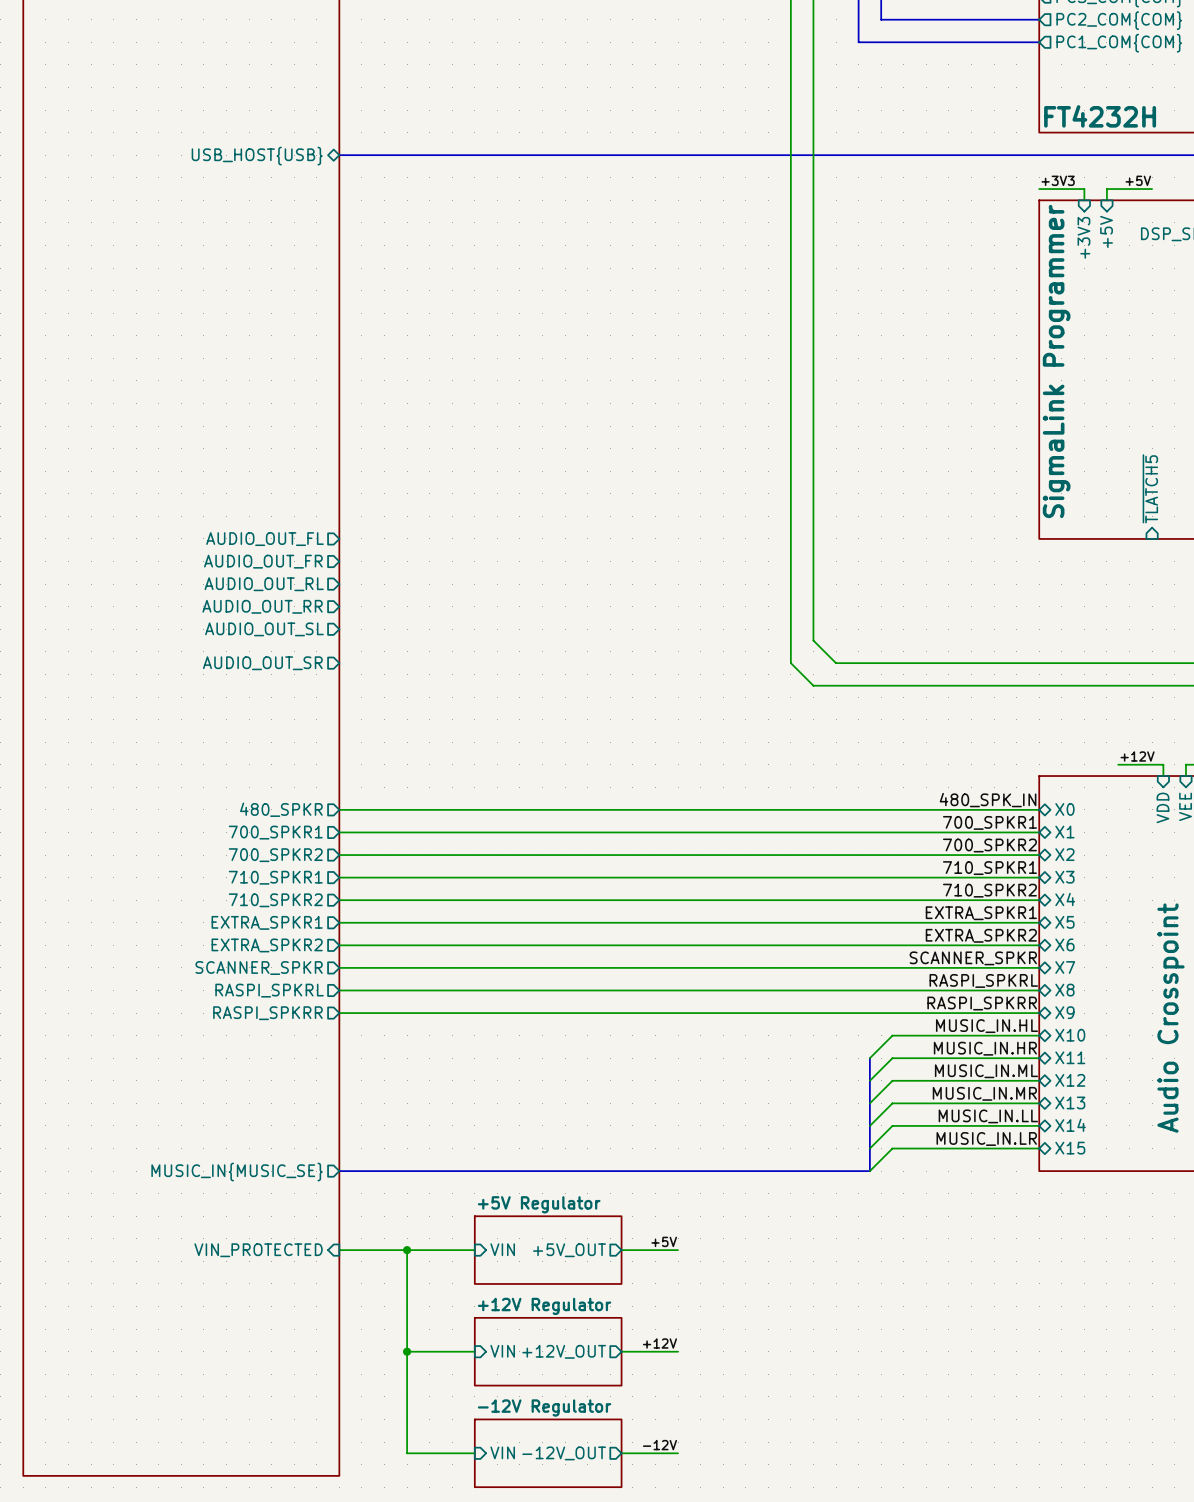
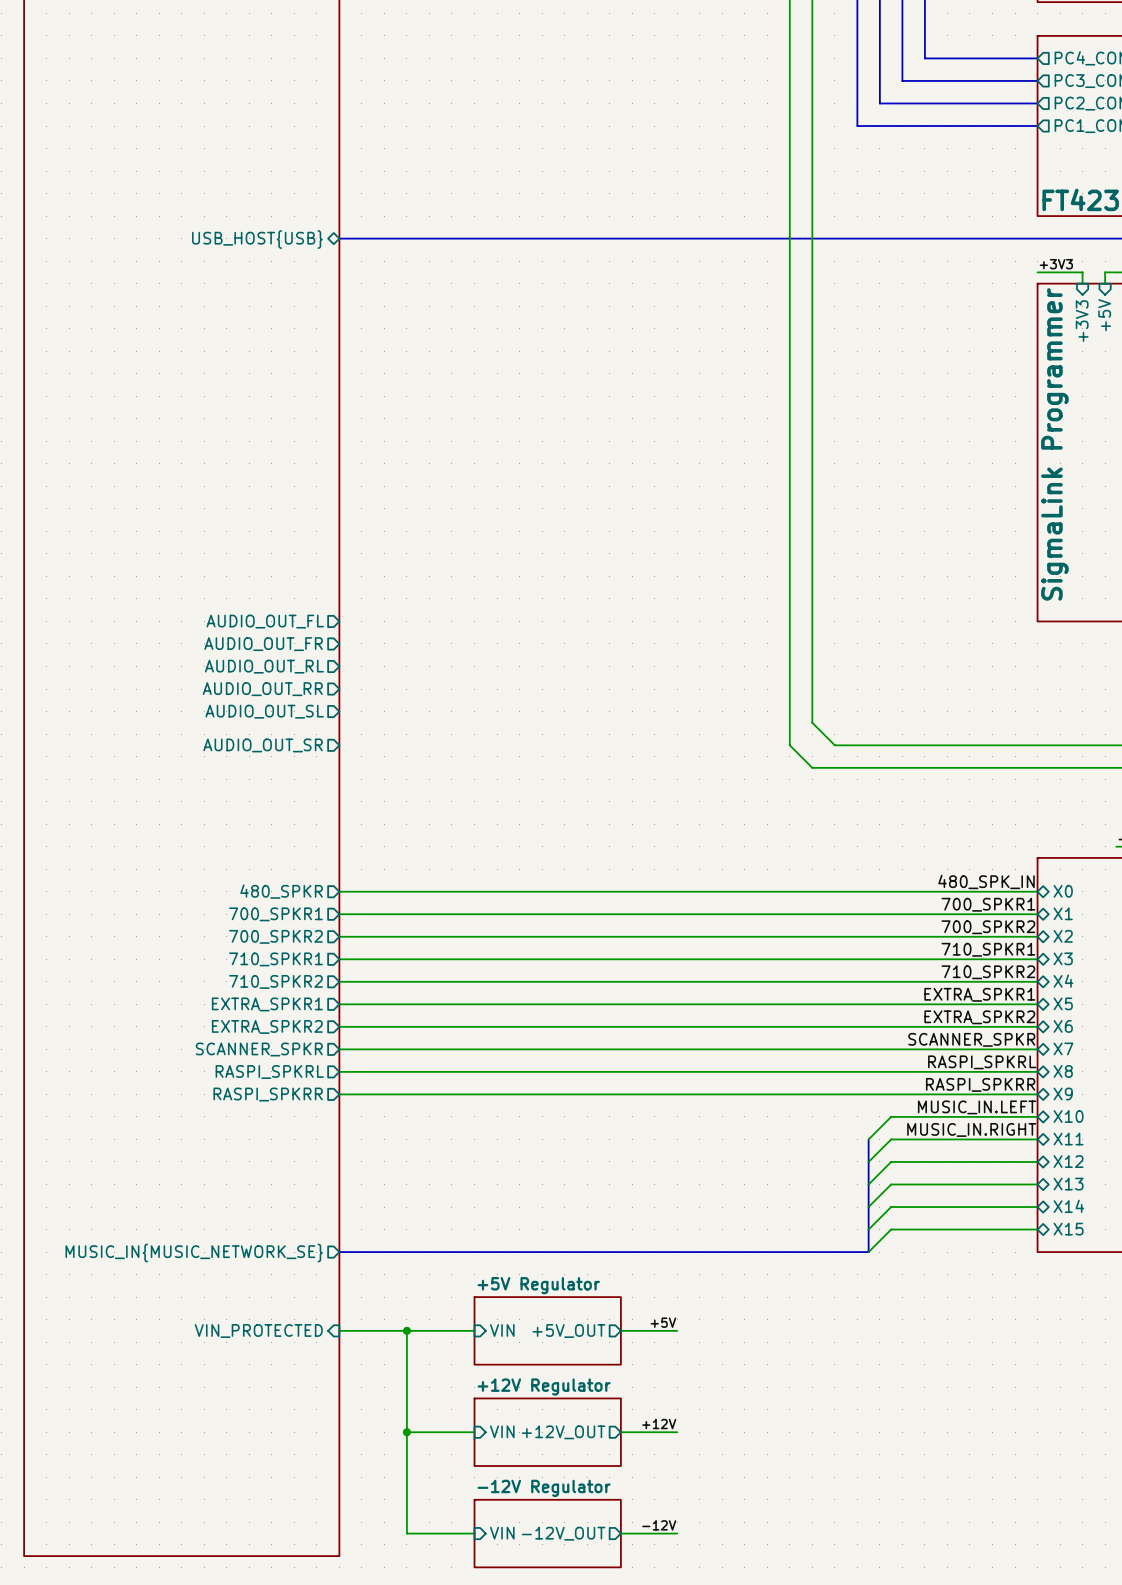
label: MUSIC_IN.HL (986, 1026) -> MUSIC_IN.LEFT (977, 1107)
label: MUSIC_IN.HR (985, 1048) -> MUSIC_IN.RIGHT (971, 1129)
label: MUSIC_IN.ML (986, 1071) -> none
label: MUSIC_IN.MR (984, 1093) -> none
label: MUSIC_IN.LL (988, 1116) -> none
label: MUSIC_IN.LR (986, 1138) -> none
sheet pin: MUSIC_IN{MUSIC_SE} (237, 1172) -> MUSIC_IN{MUSIC_NETWORK_SE} (194, 1252)

